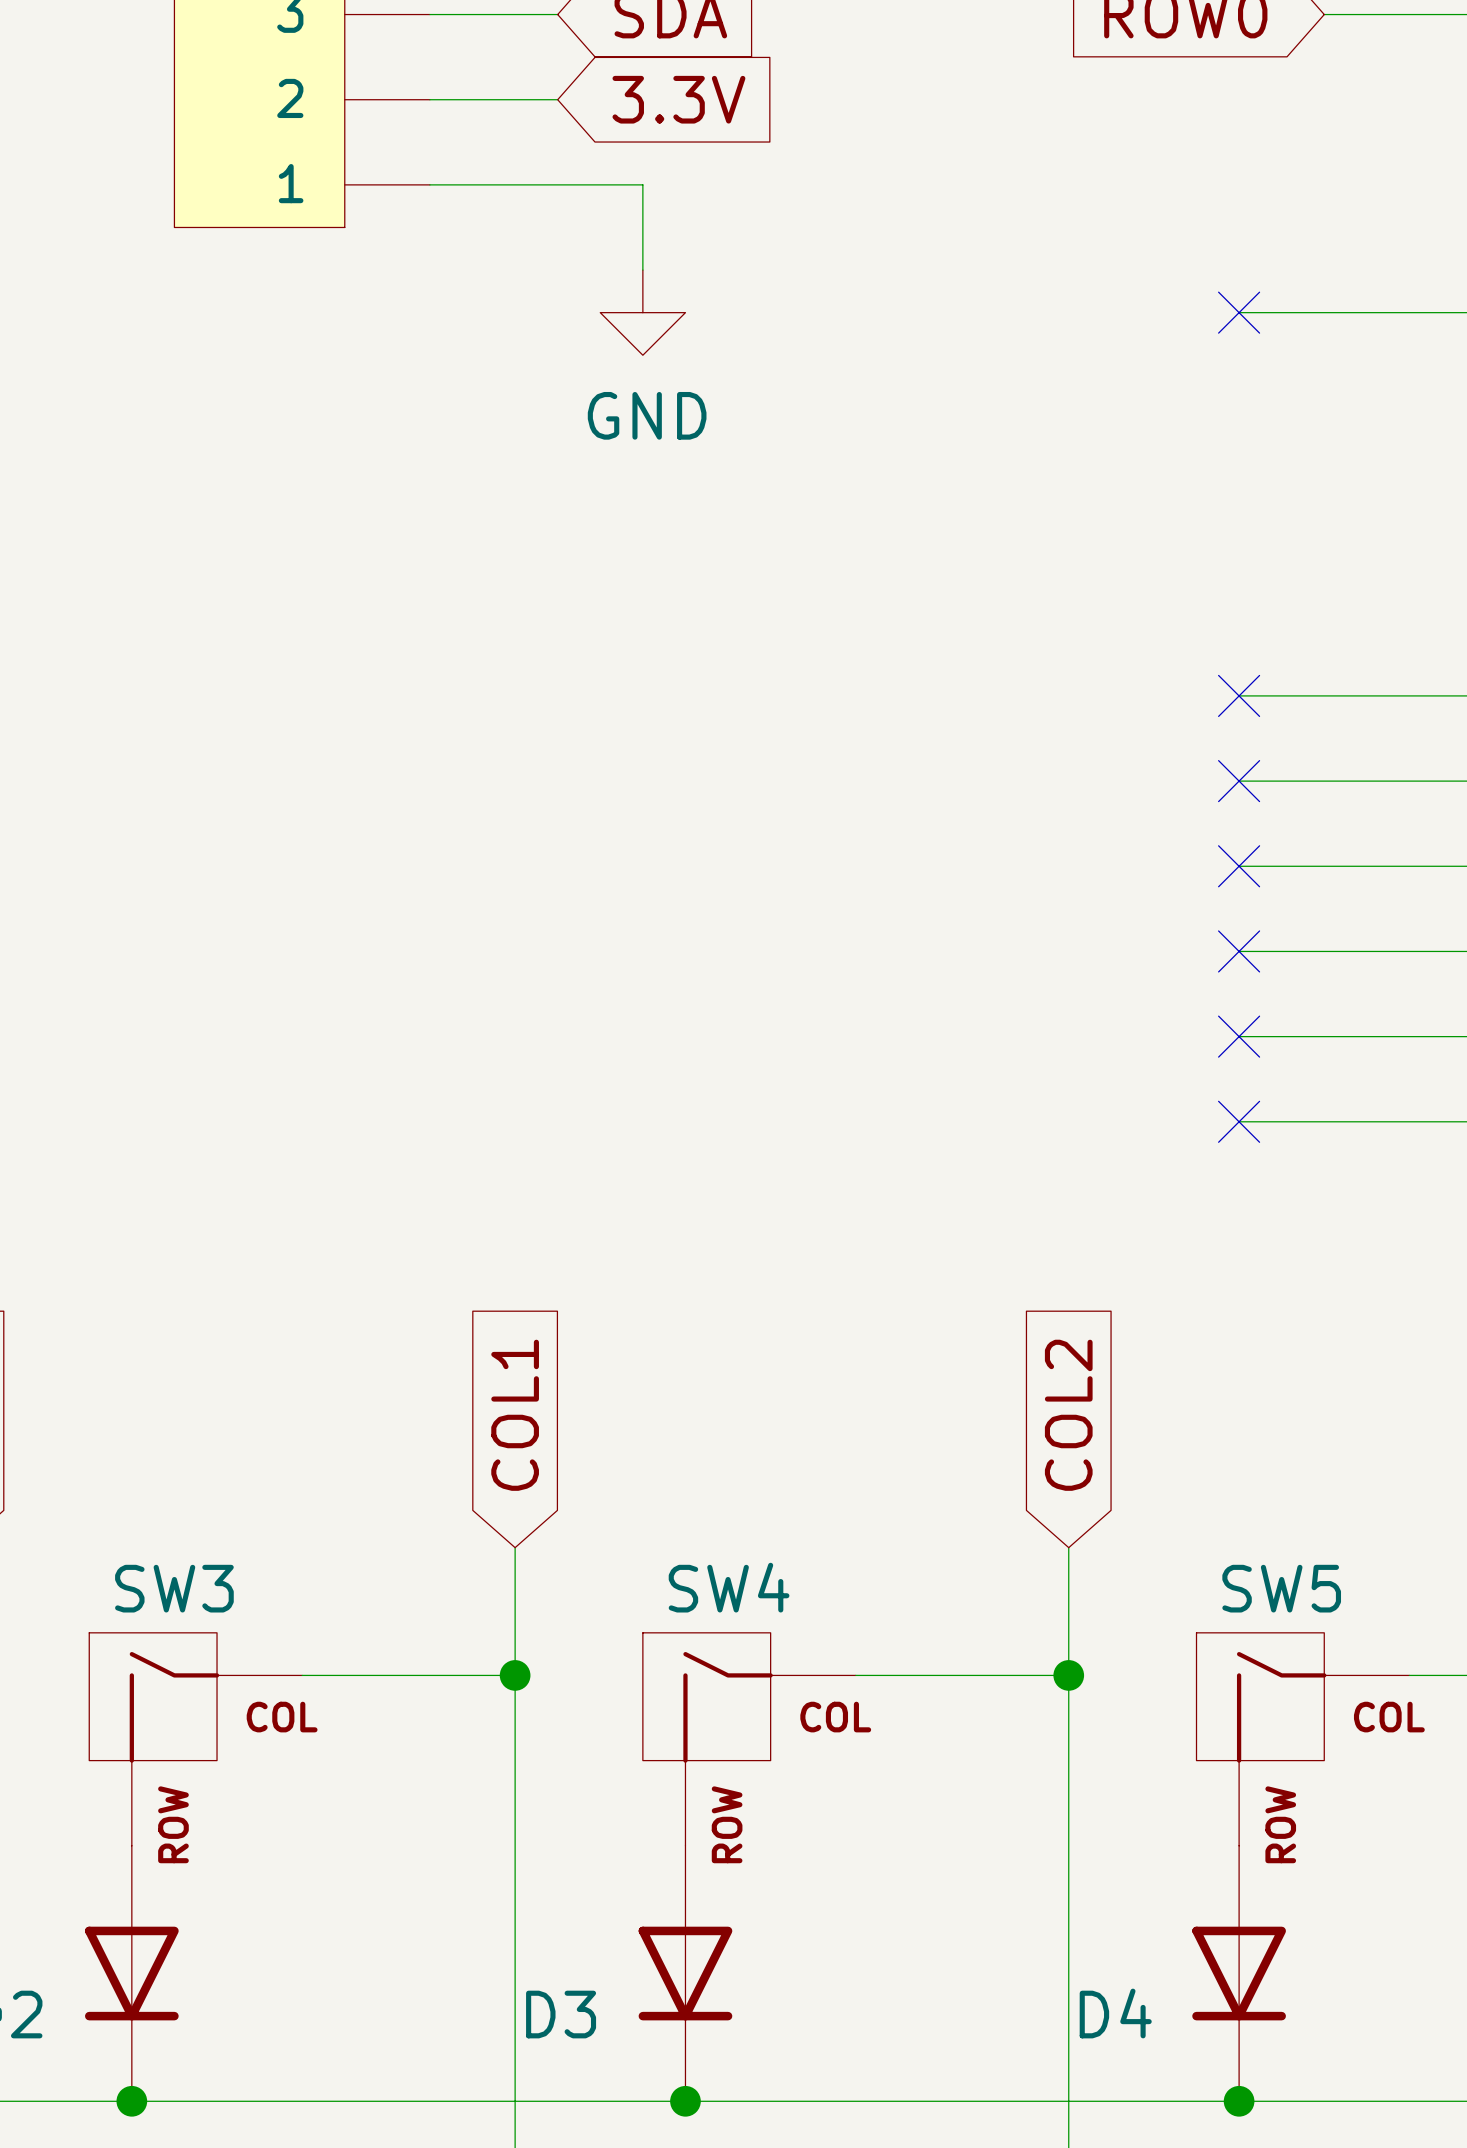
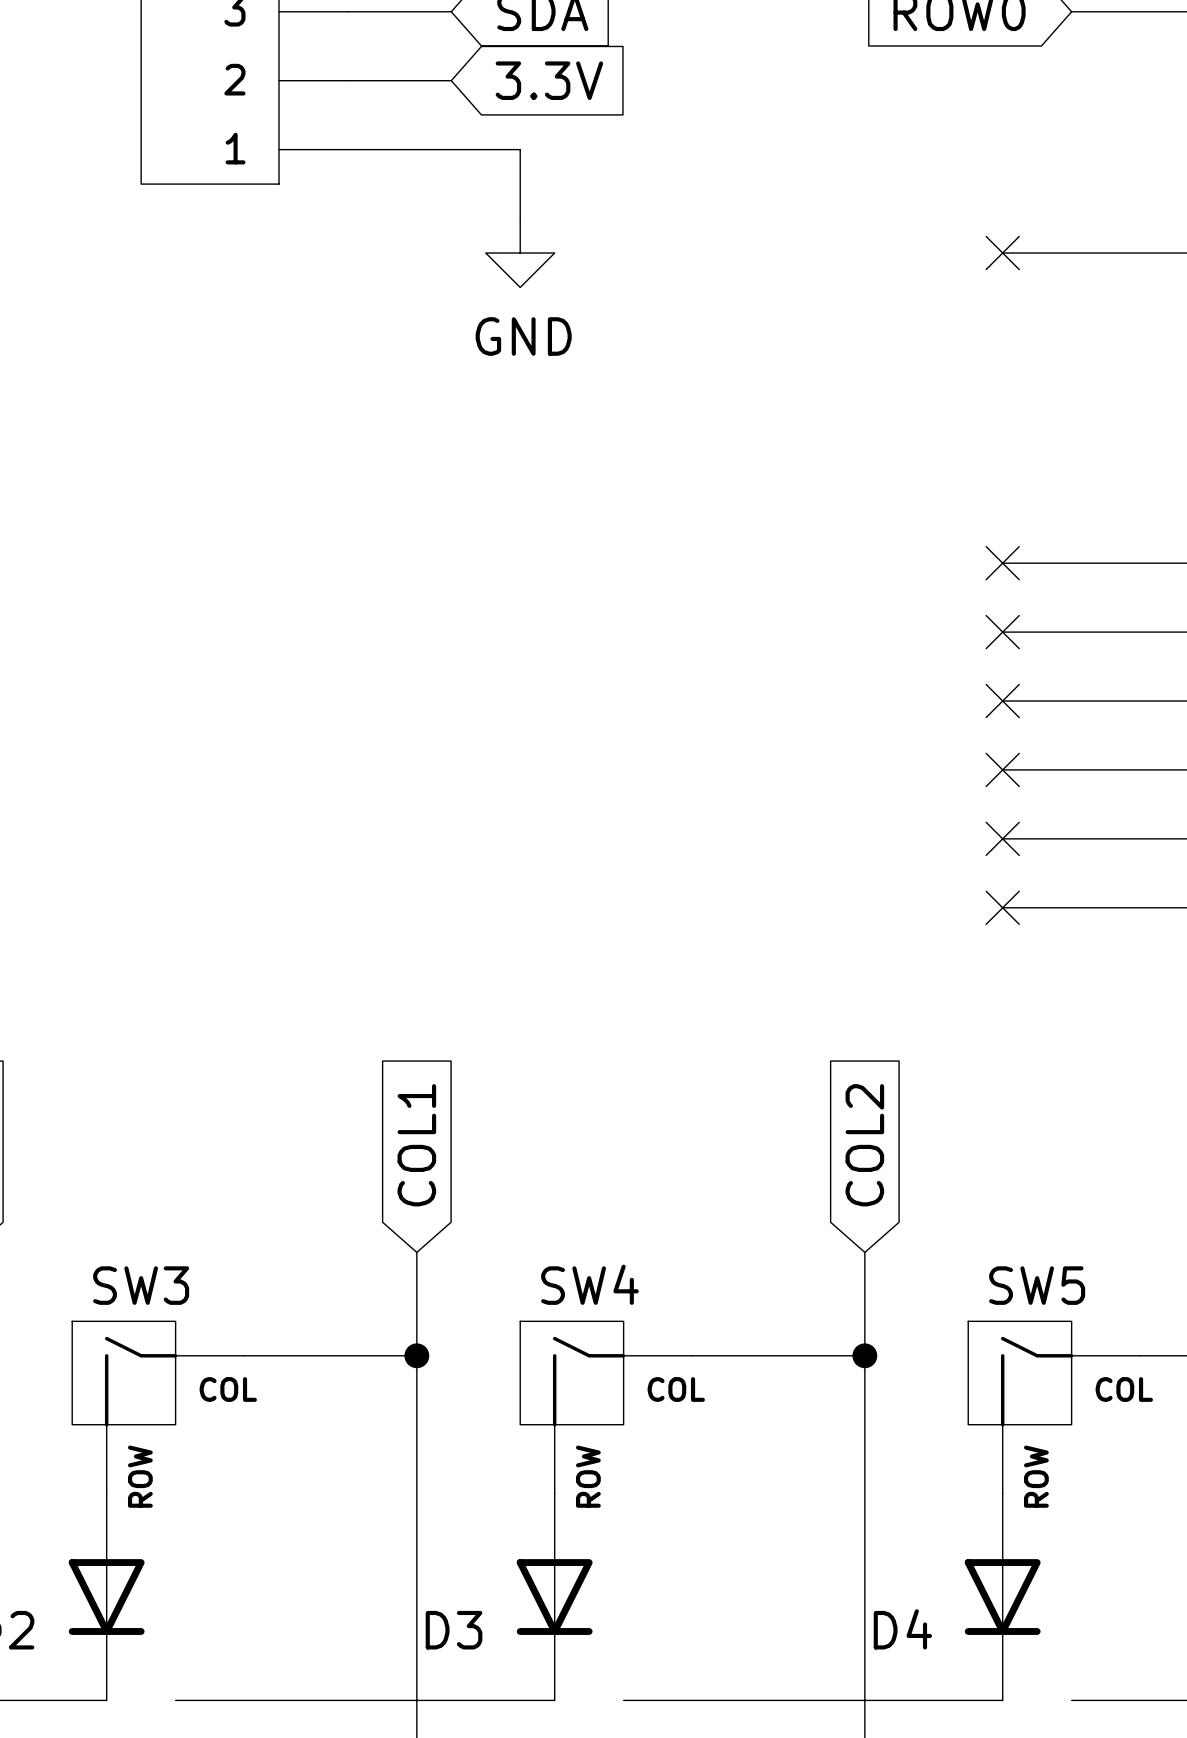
wire: (131, 2101) (217, 2101) -> none
junction: (131, 2101) -> none
wire: (685, 2101) (770, 2101) -> none
junction: (685, 2101) -> none
wire: (1239, 2101) (1324, 2101) -> none
junction: (1239, 2101) -> none

